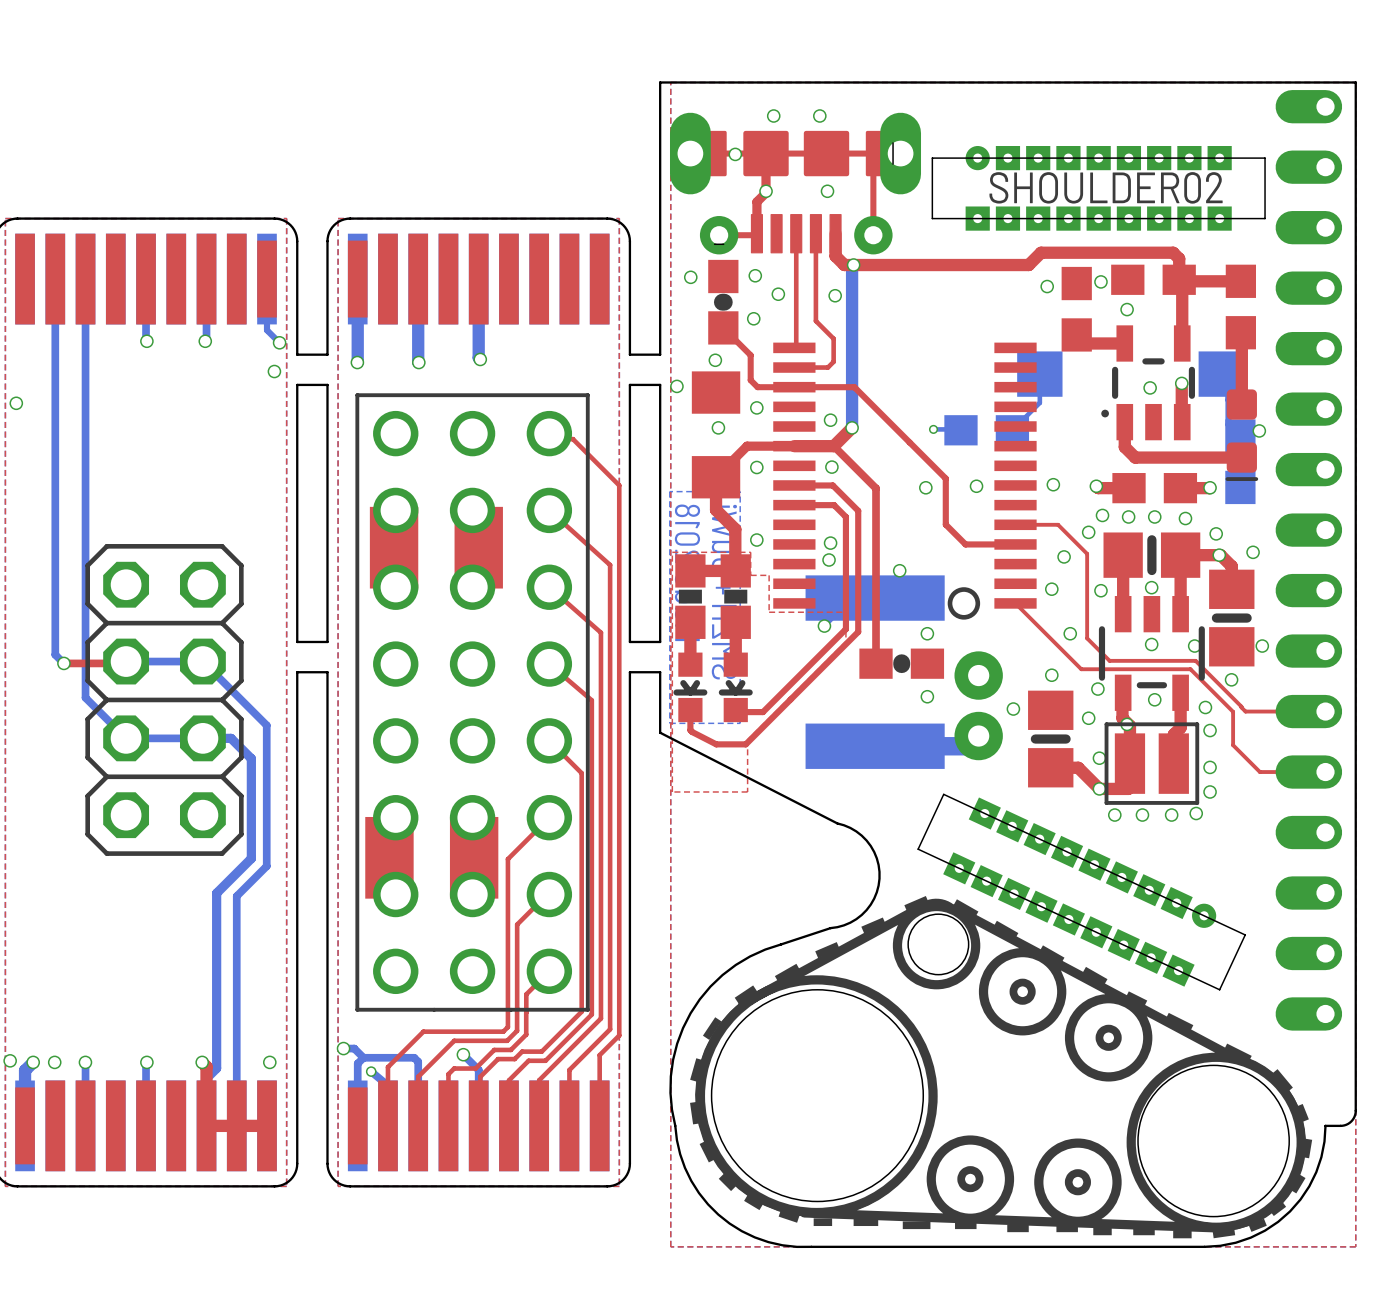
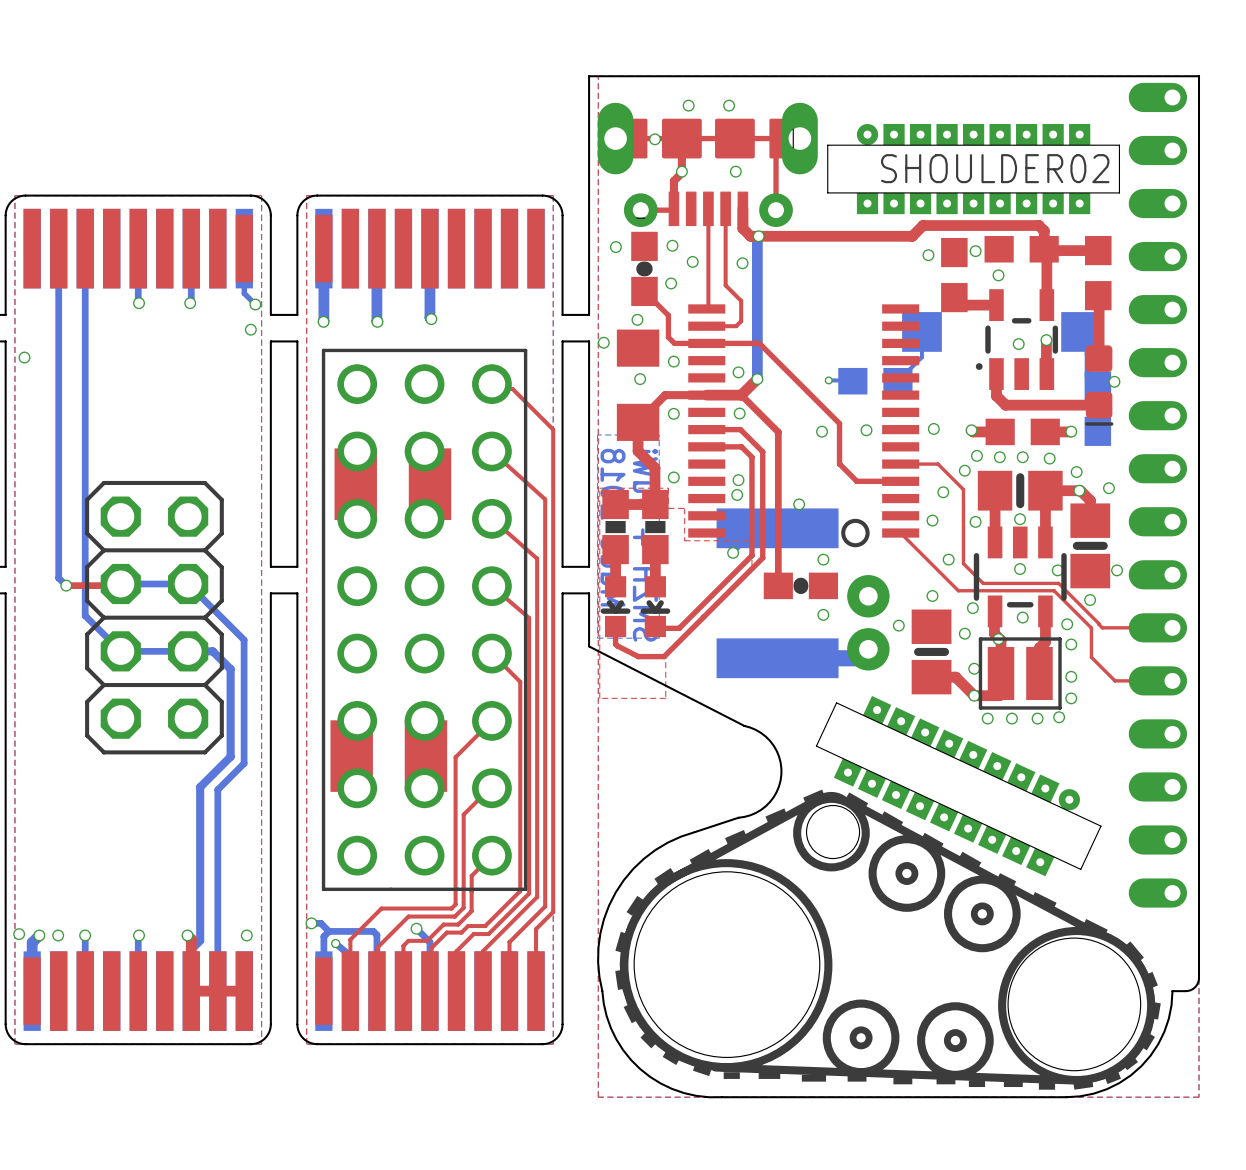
SHOULDER02 footprint: [931, 145, 1266, 231] -> [827, 123, 1120, 215]
part footprint: [917, 793, 1246, 991] -> [816, 695, 1102, 877]

